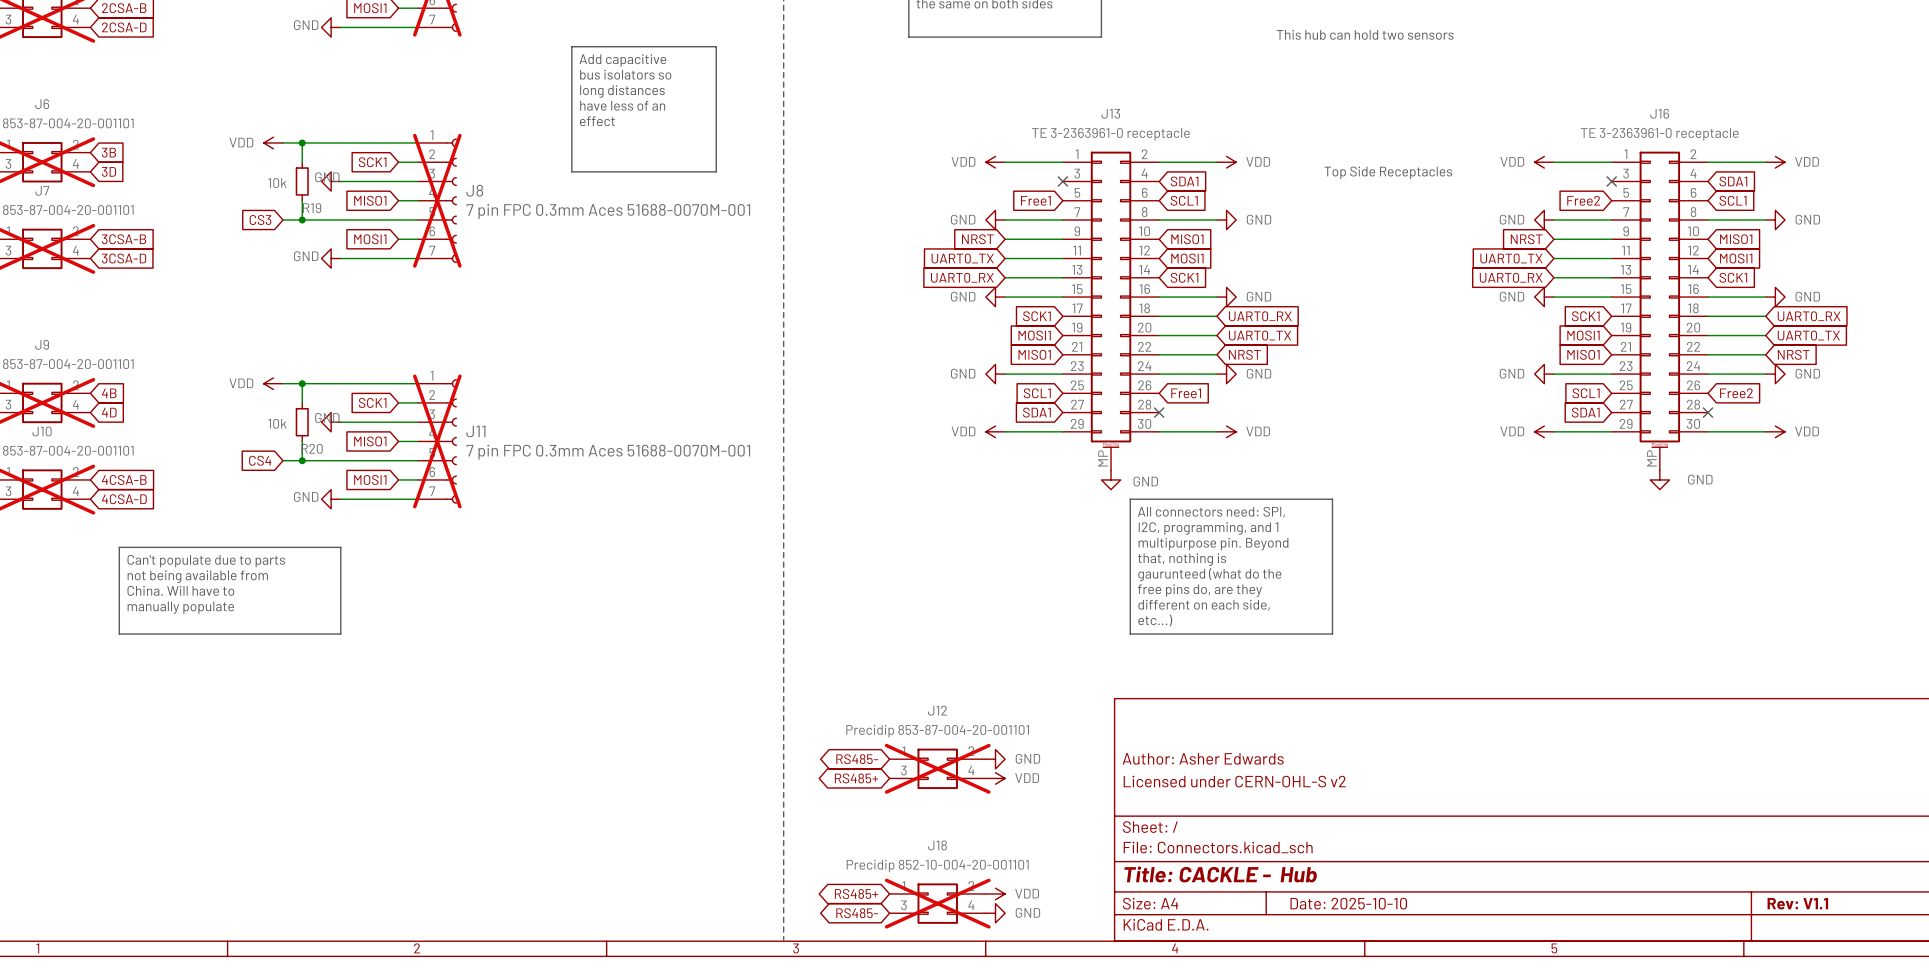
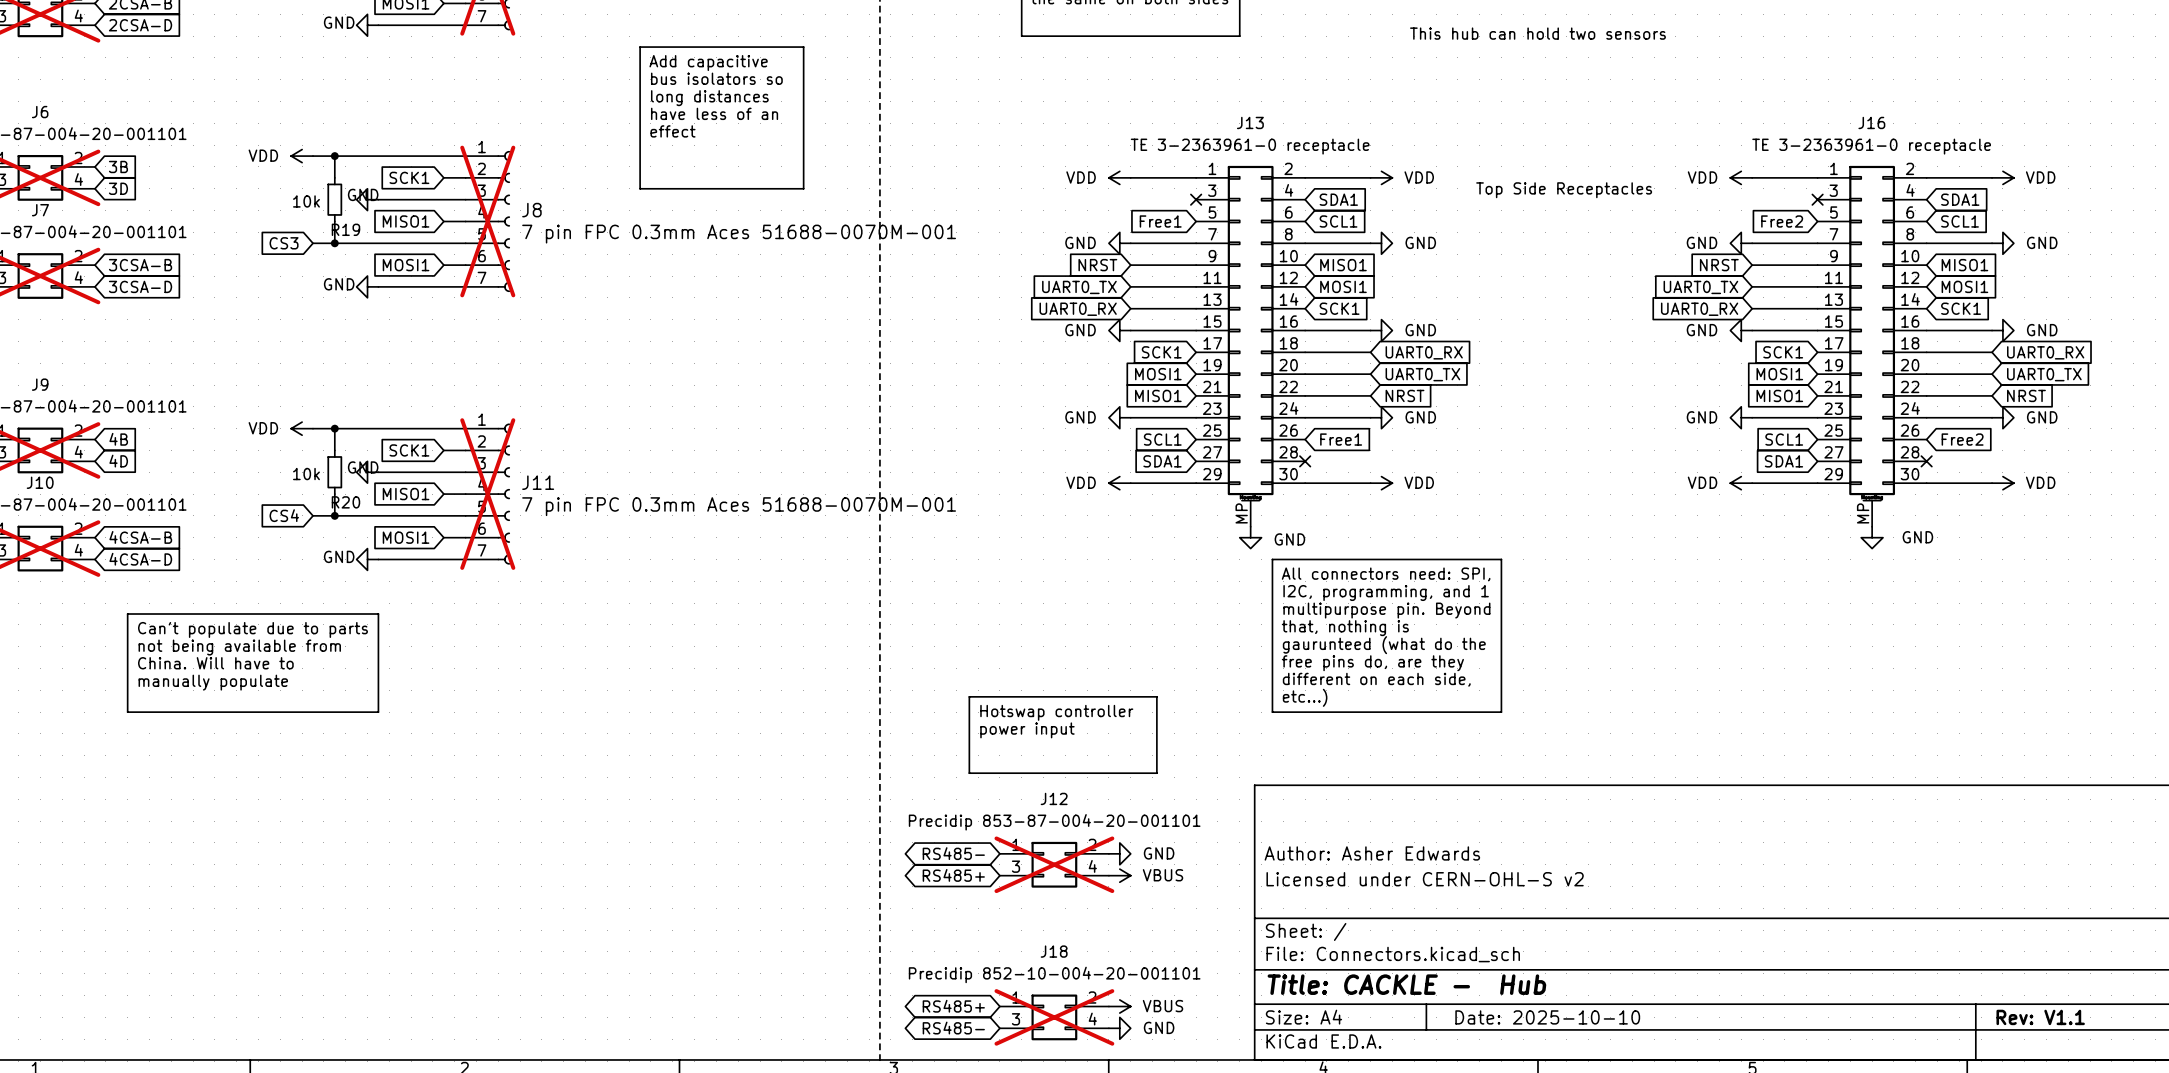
line: none -> (969, 696) (1156, 696) (1156, 773) (969, 773) (969, 696)
text: none -> Hotswap controller (1056, 712)
text: none -> power input (1027, 730)
power symbol: VDD (995, 778) -> VBUS (1119, 875)
power symbol: VDD (995, 893) -> VBUS (1119, 1006)

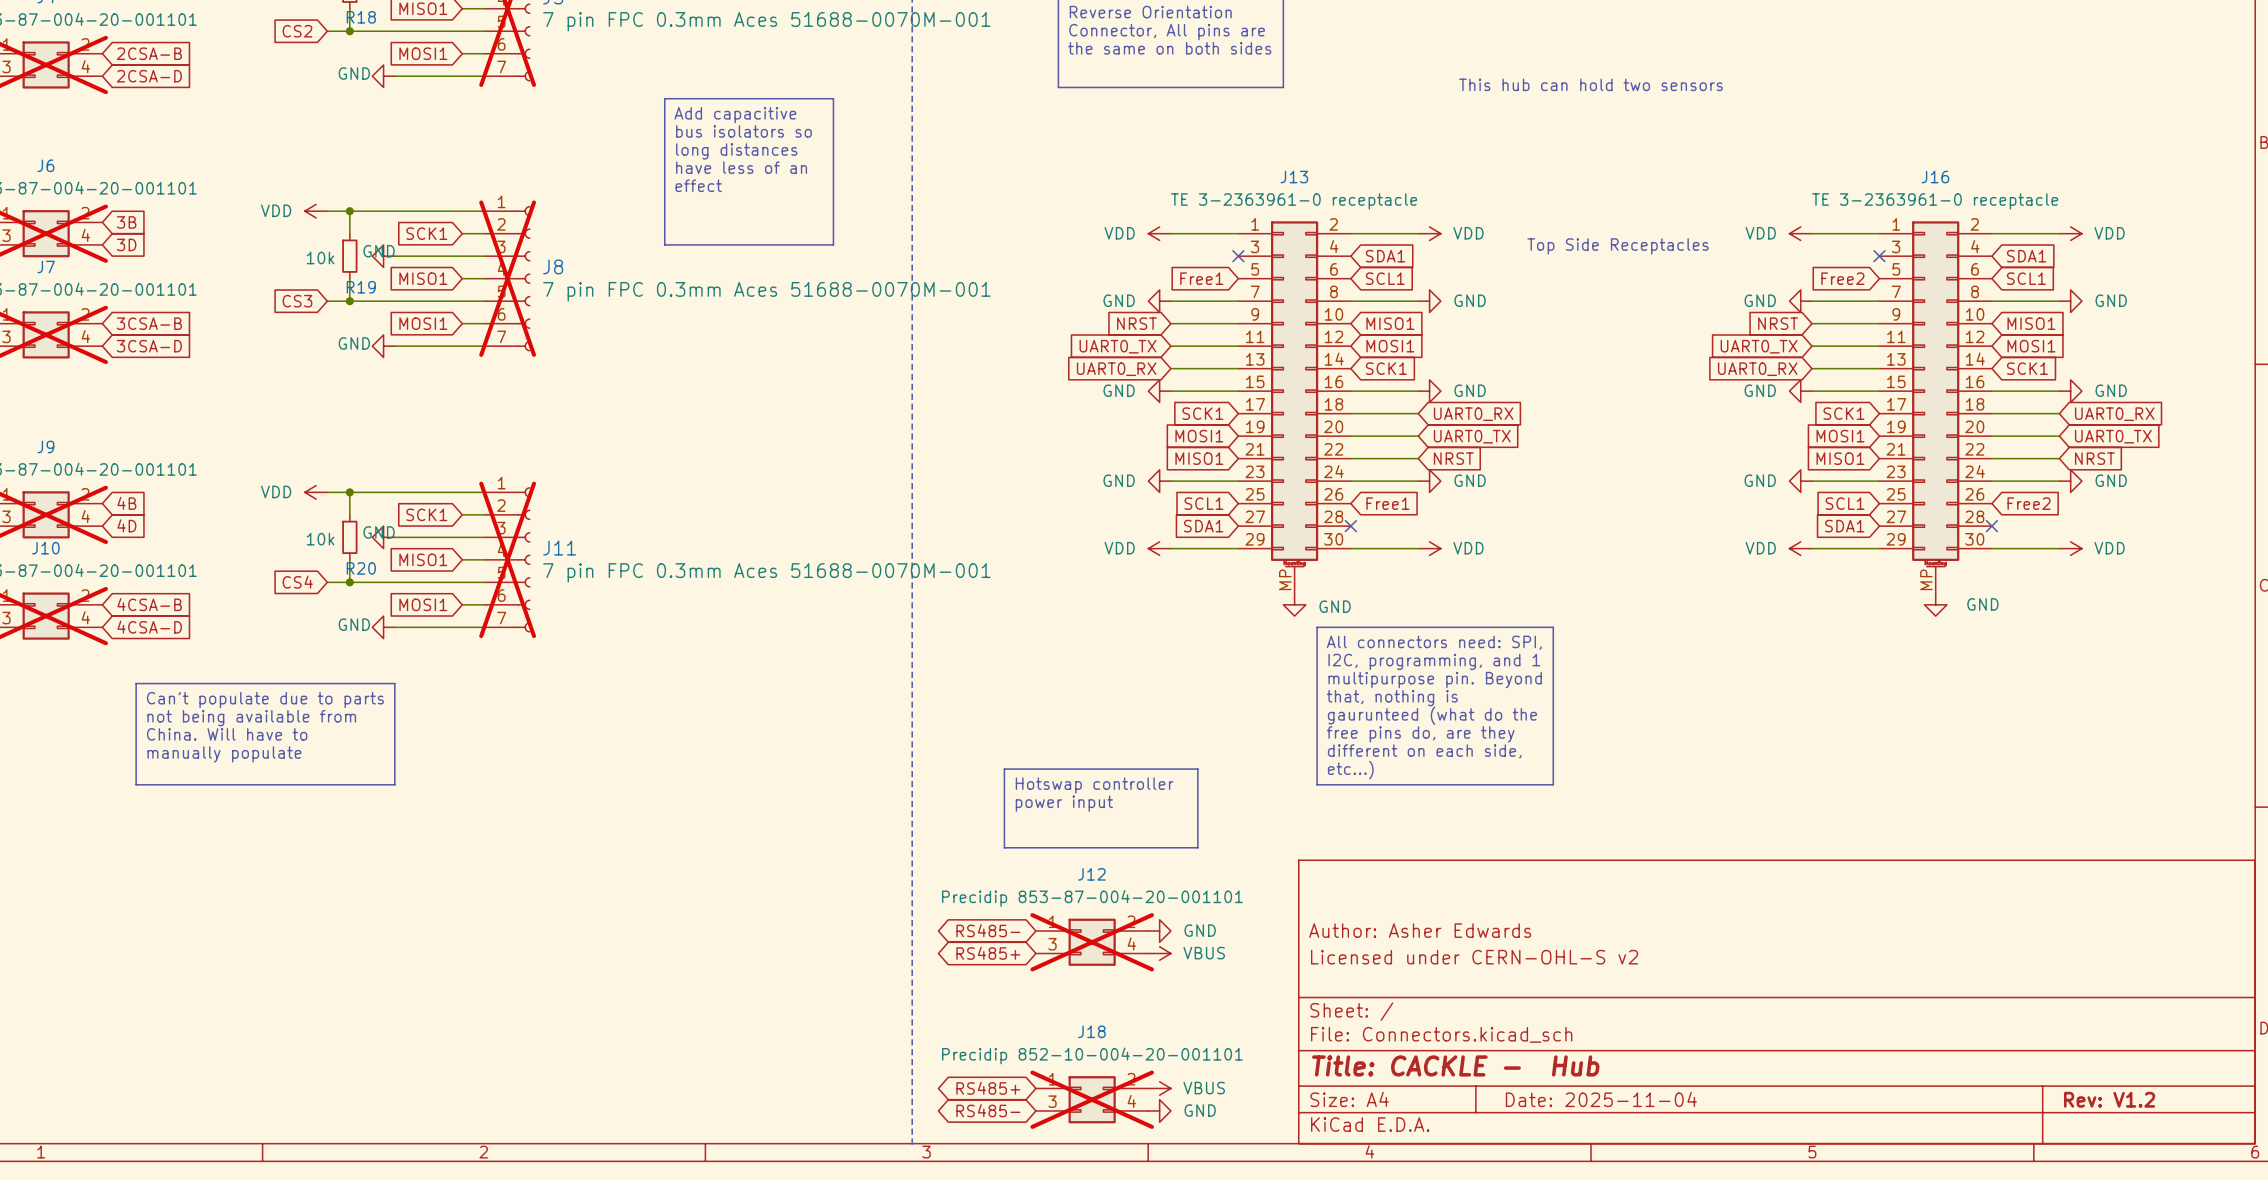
title block: Date: 2025-10-10 (1547, 1017) -> Date: 2025-11-04 (1601, 1099)
title block: Rev: V1.1 (2040, 1017) -> Rev: V1.2 (2109, 1099)

